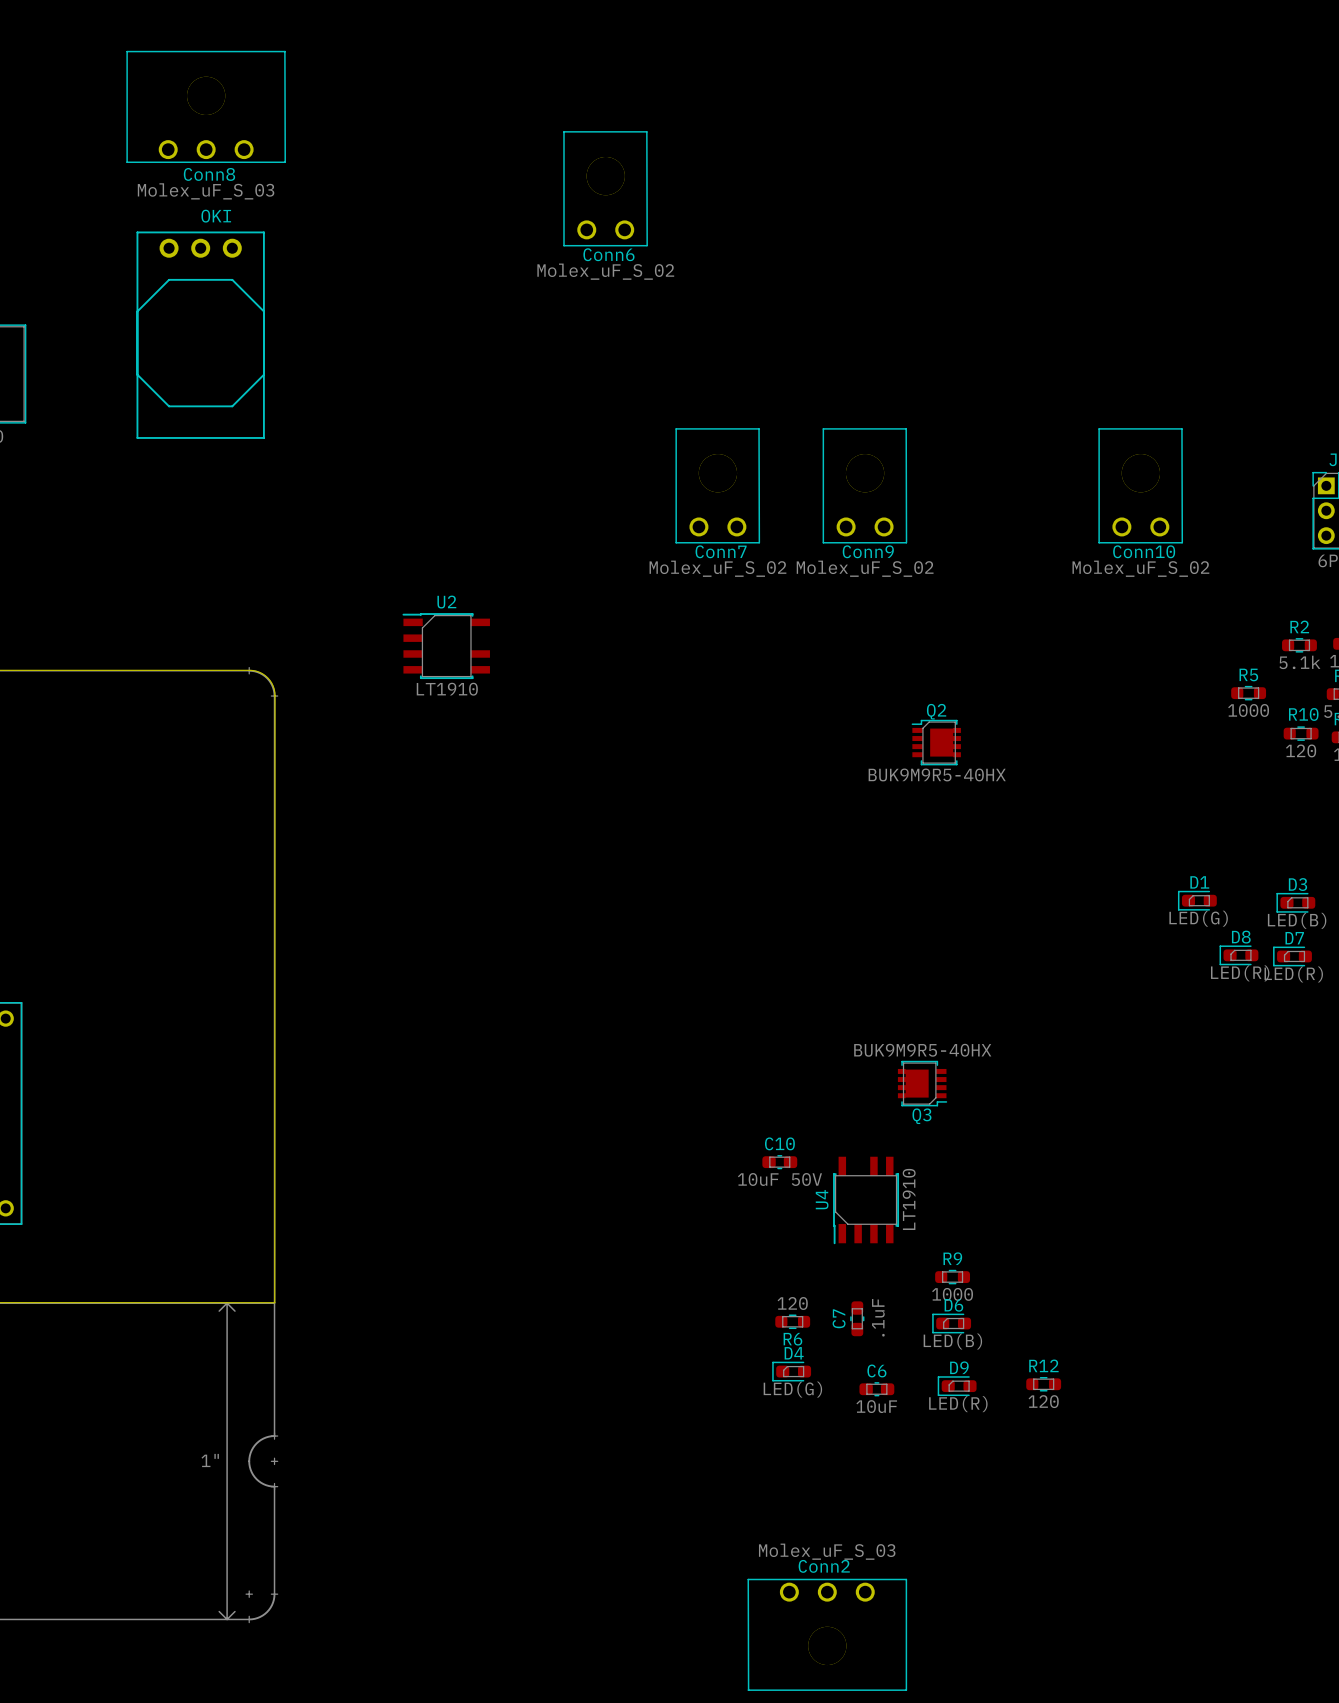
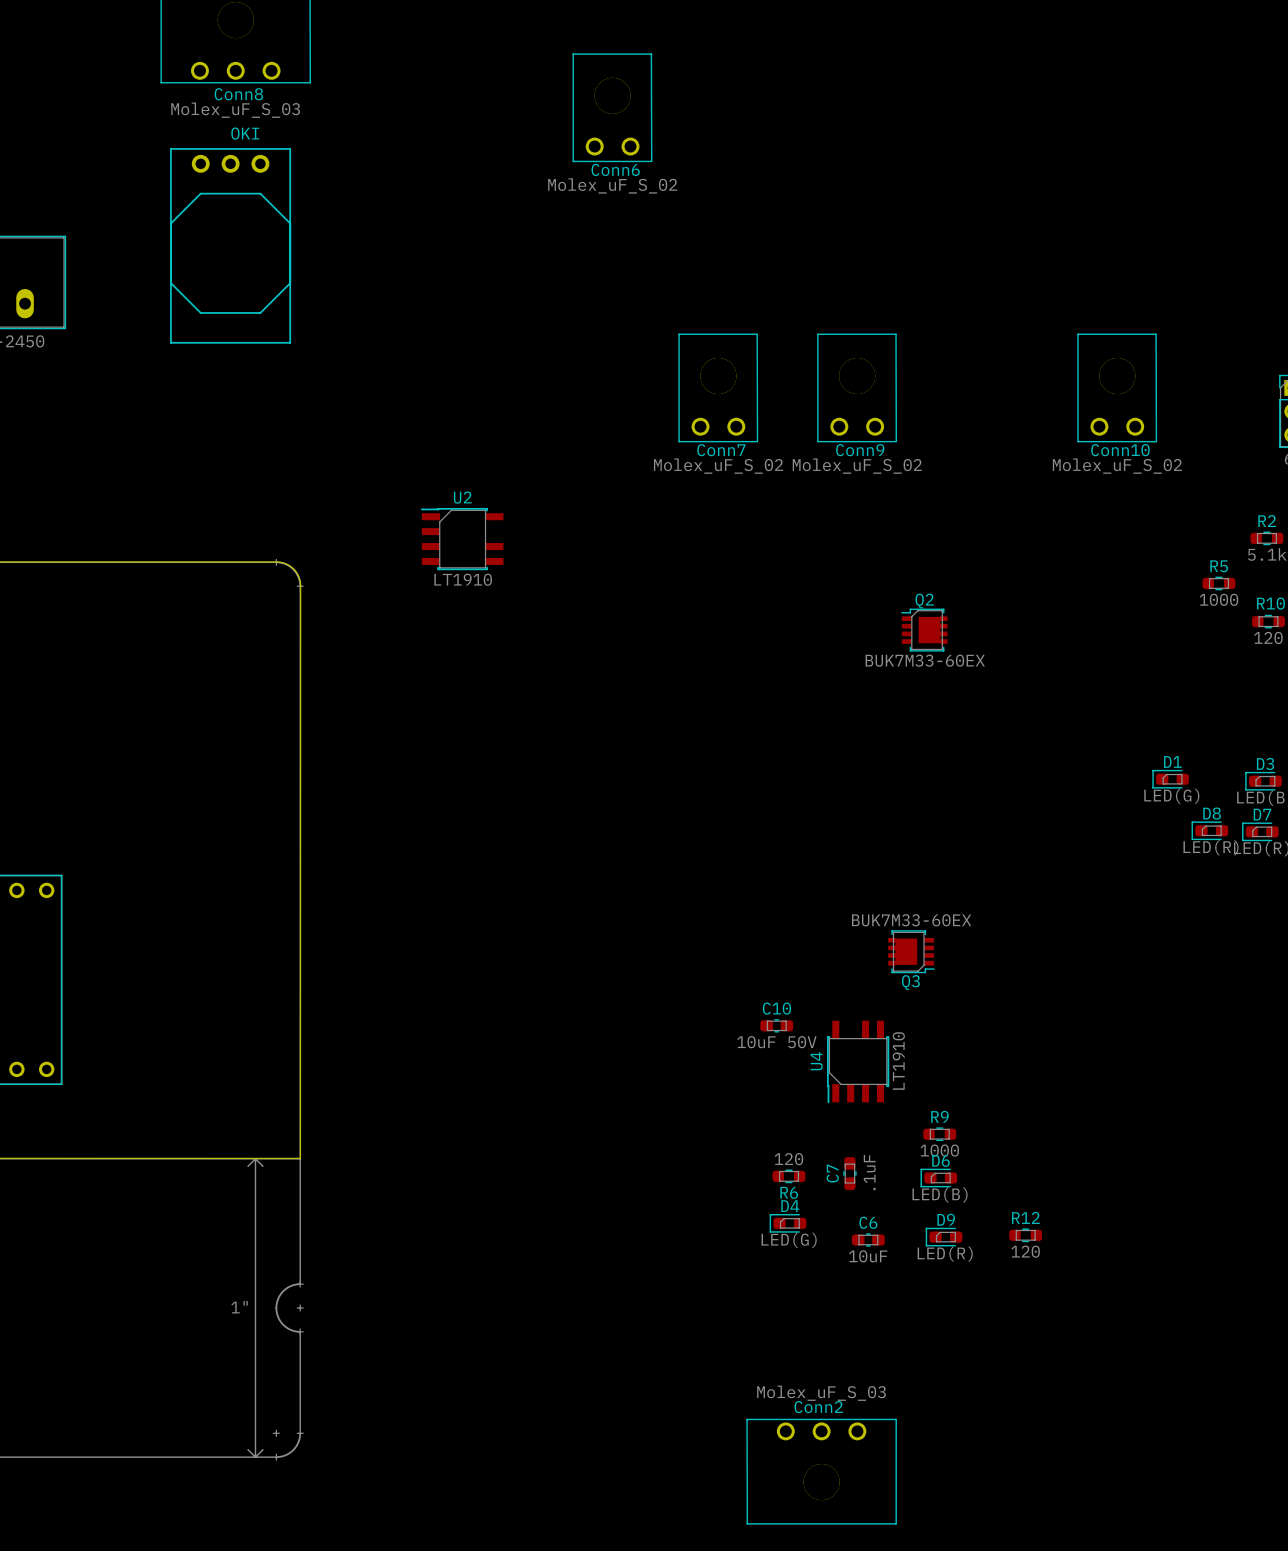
Q2 value: BUK9M9R5-40HX (937, 774) -> BUK7M33-60EX (925, 660)
Q3 value: BUK9M9R5-40HX (922, 1050) -> BUK7M33-60EX (911, 920)

